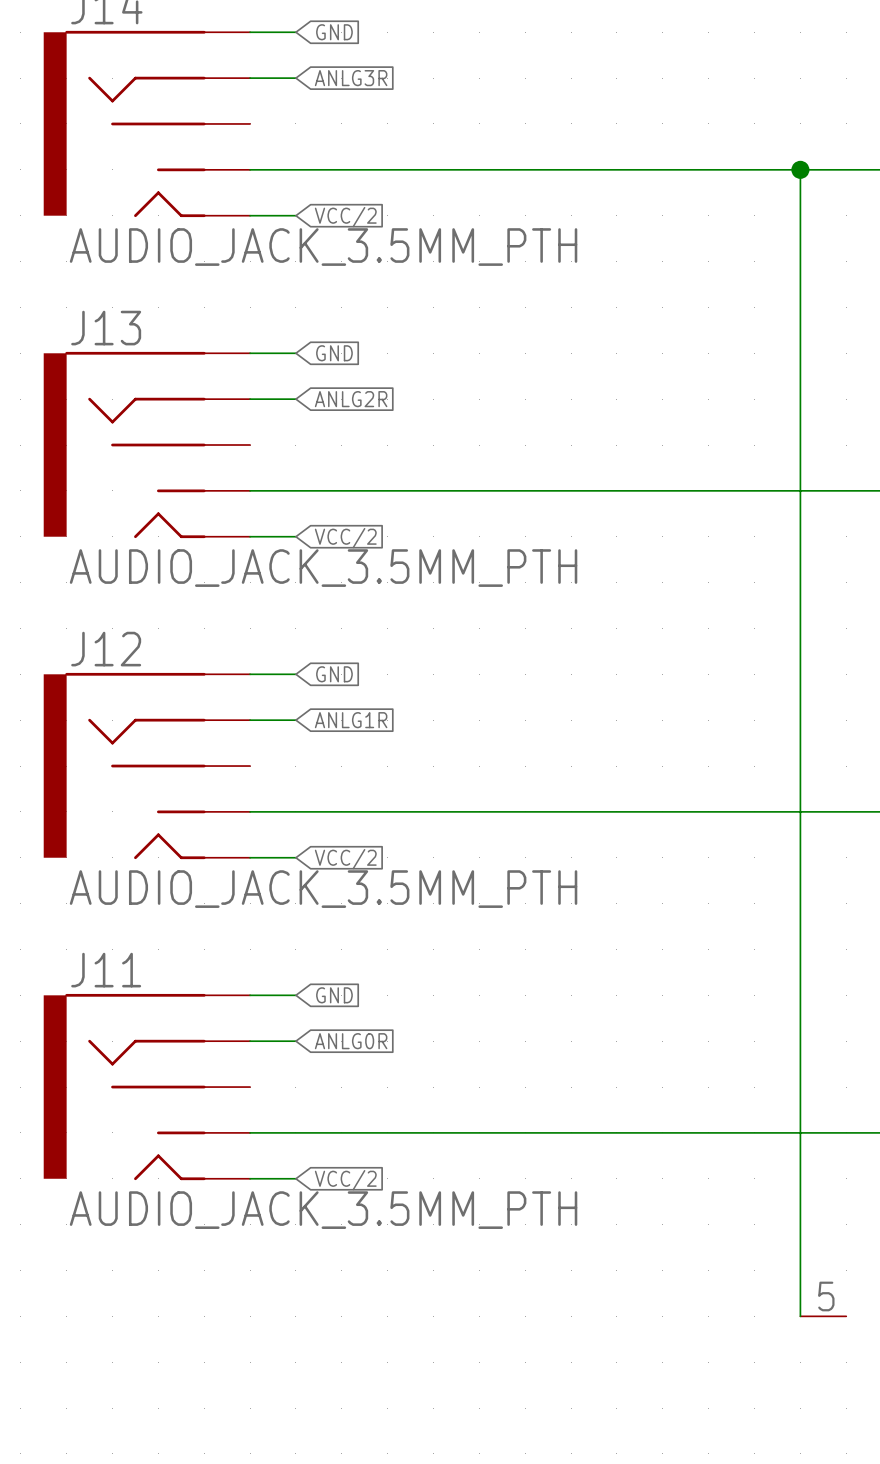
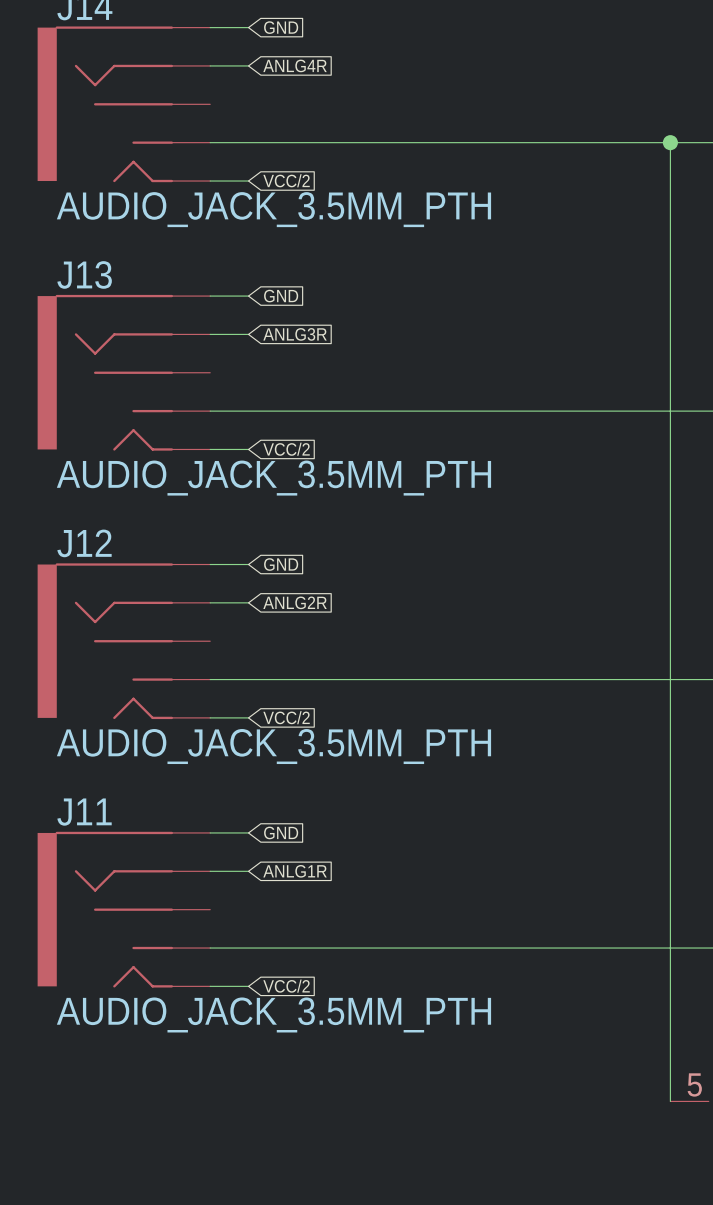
global label: ANLG3R (351, 78) -> ANLG4R (295, 65)
global label: ANLG2R (351, 399) -> ANLG3R (295, 334)
global label: ANLG1R (351, 720) -> ANLG2R (295, 602)
global label: ANLG0R (351, 1041) -> ANLG1R (295, 871)

